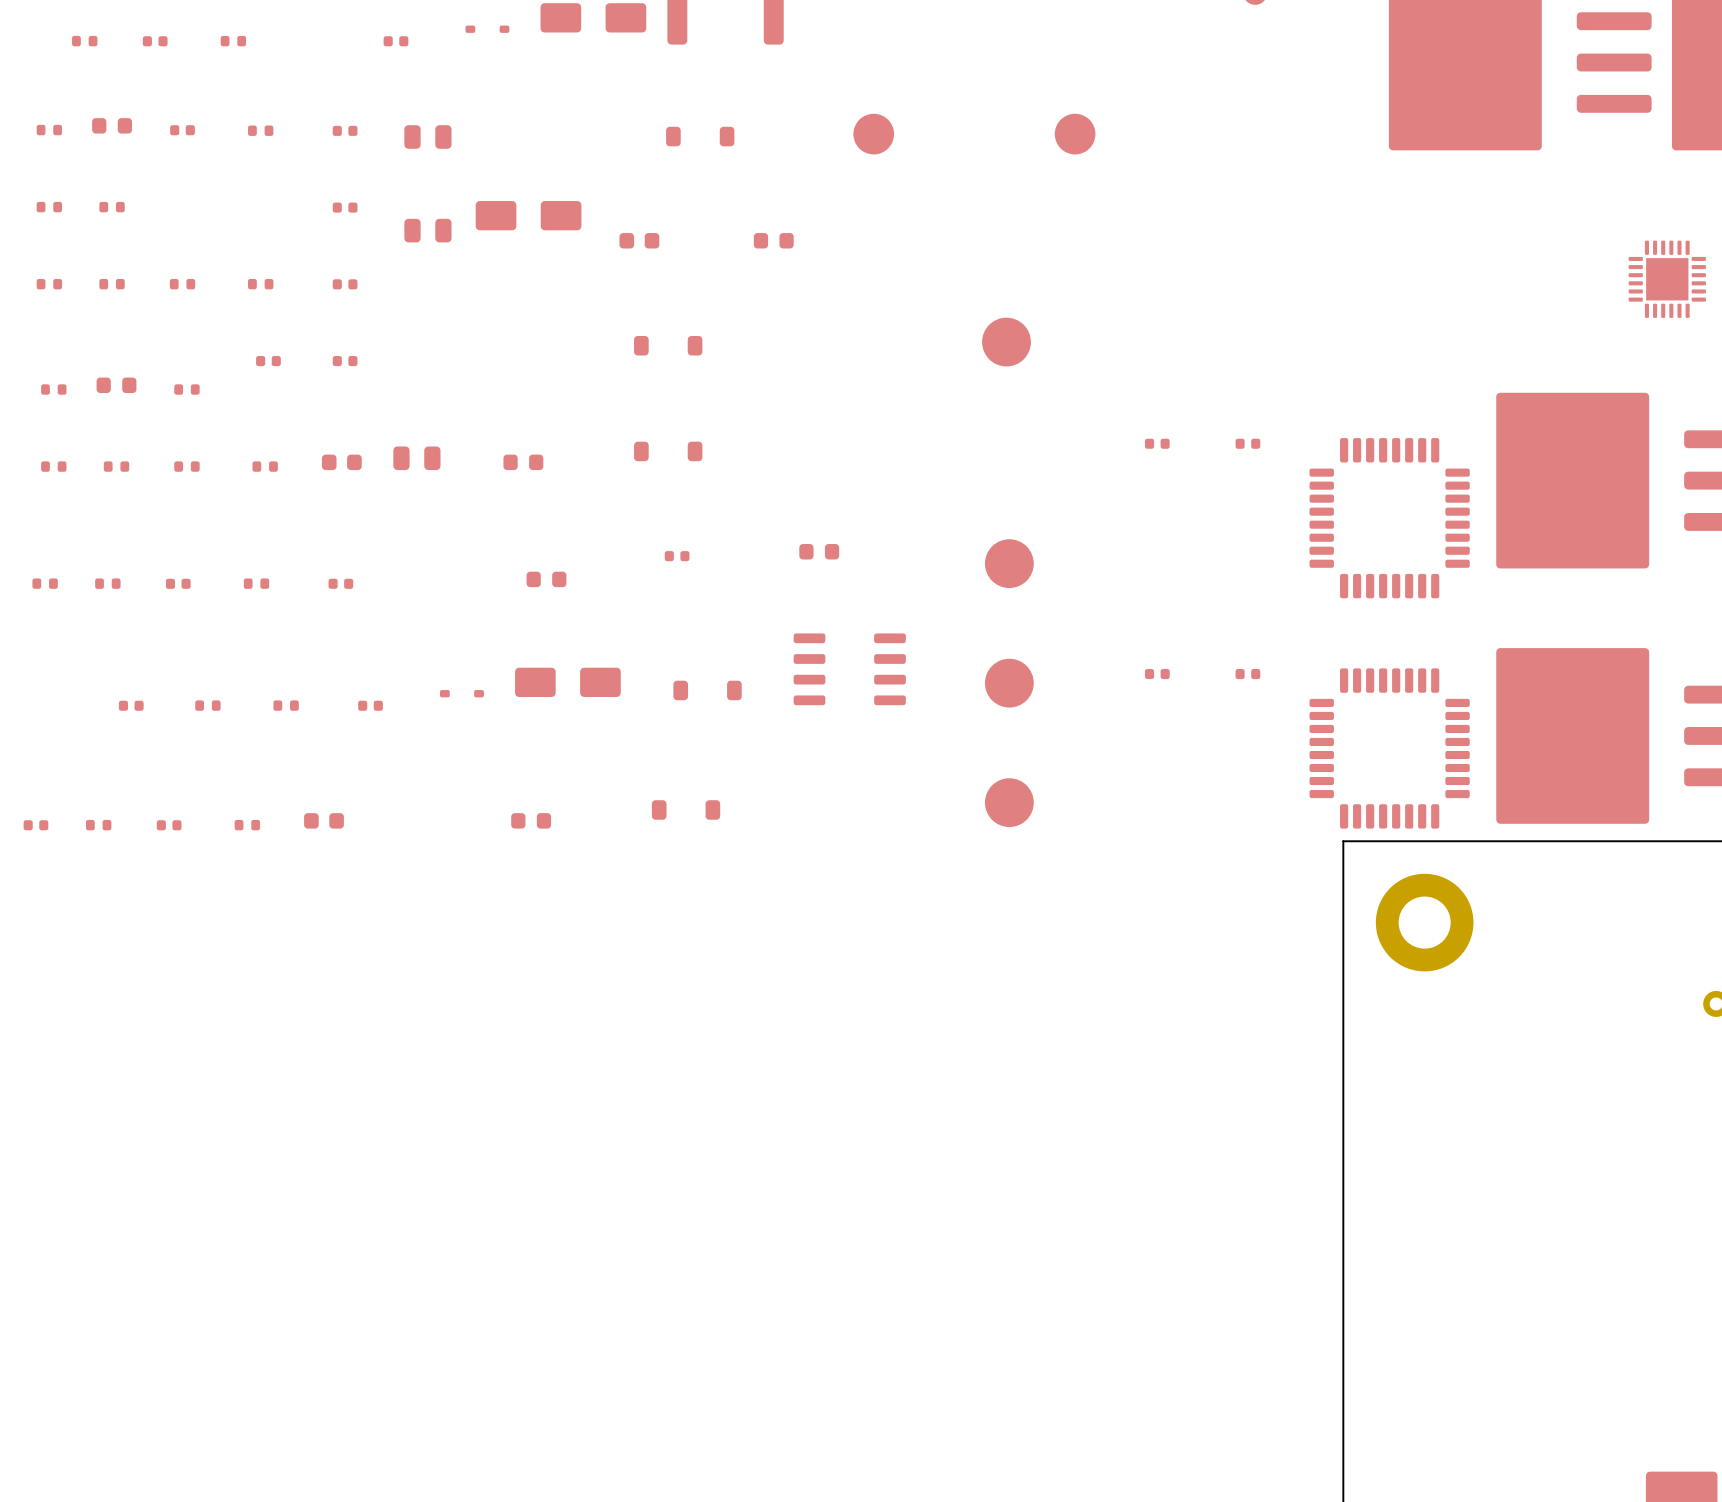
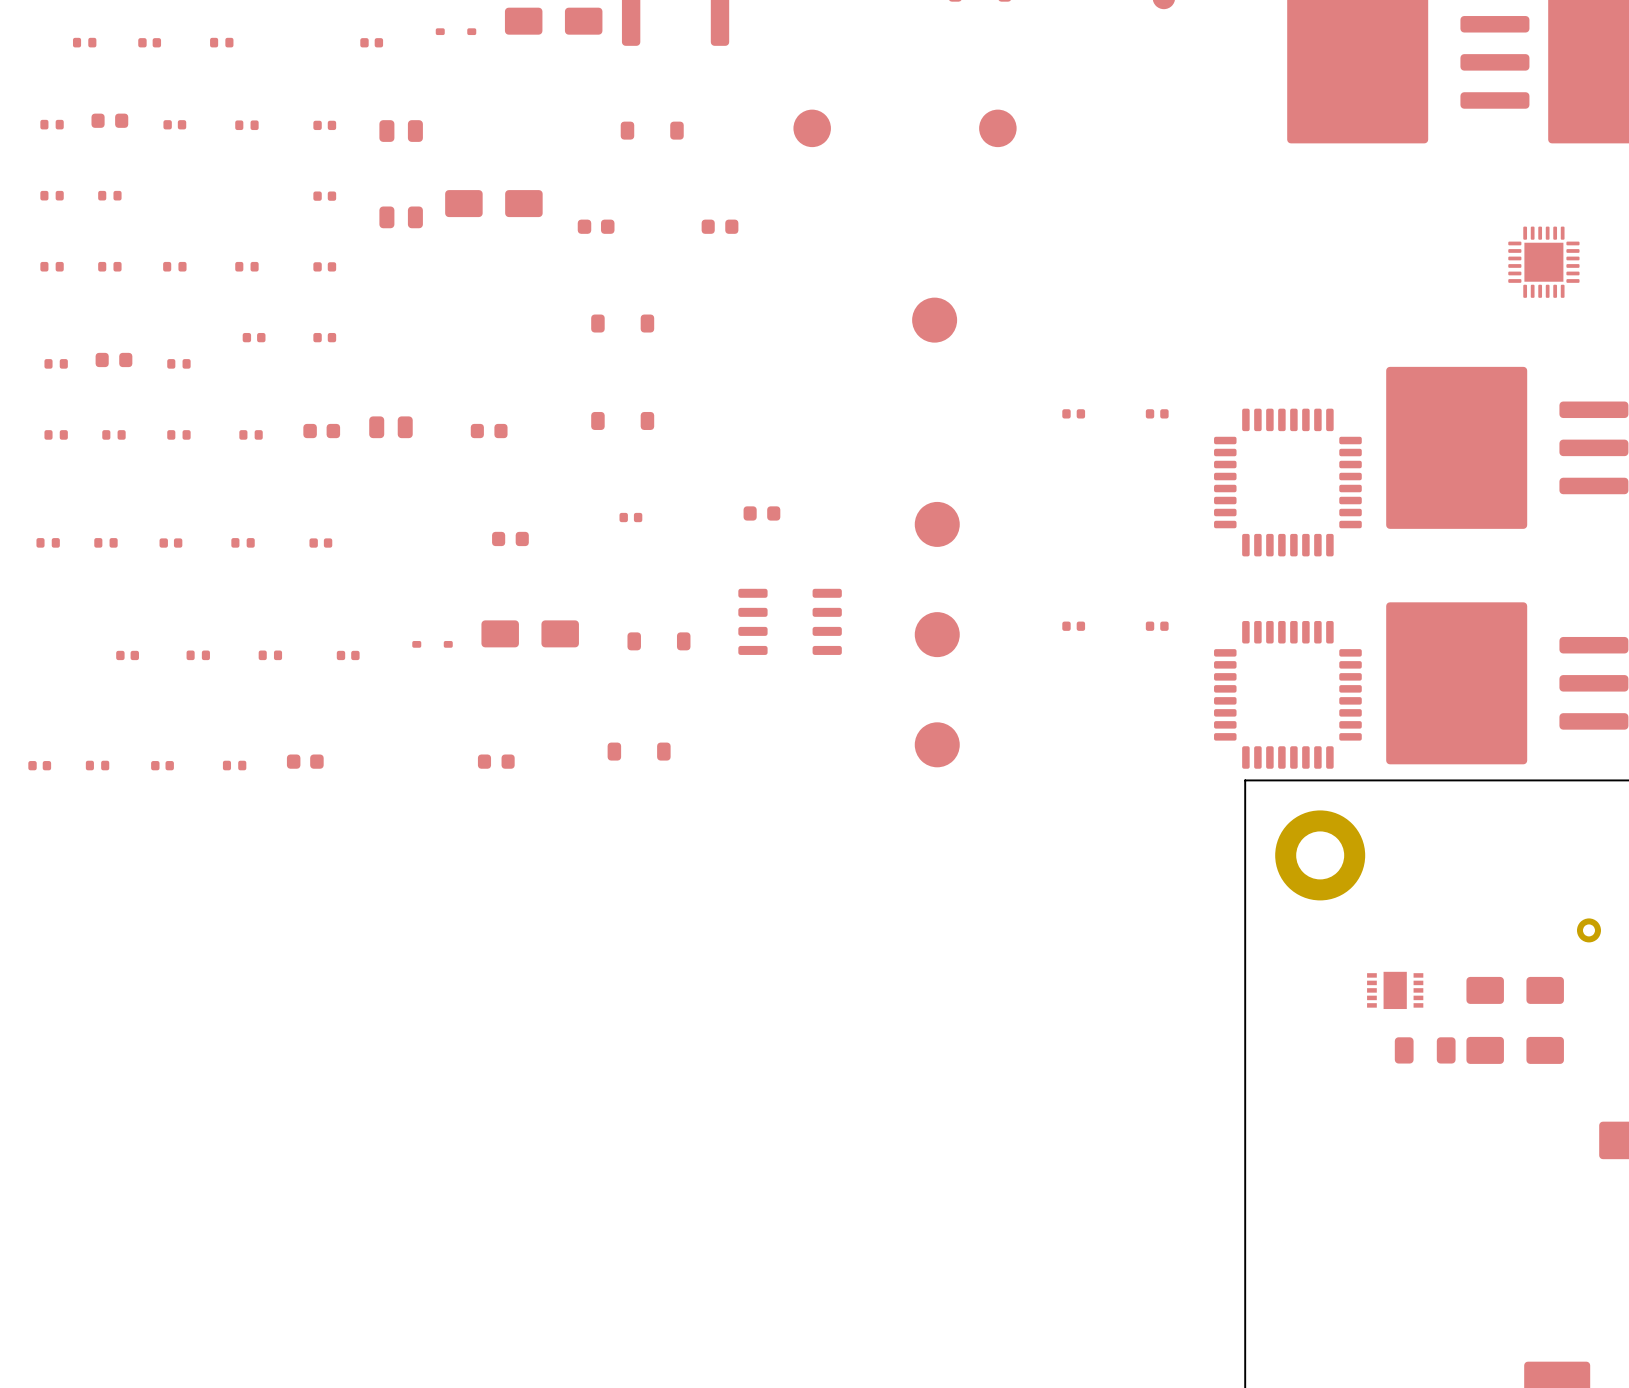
part: none -> (1395, 990)
part: none -> (1515, 990)
part: none -> (1425, 1050)
part: none -> (1515, 1050)

